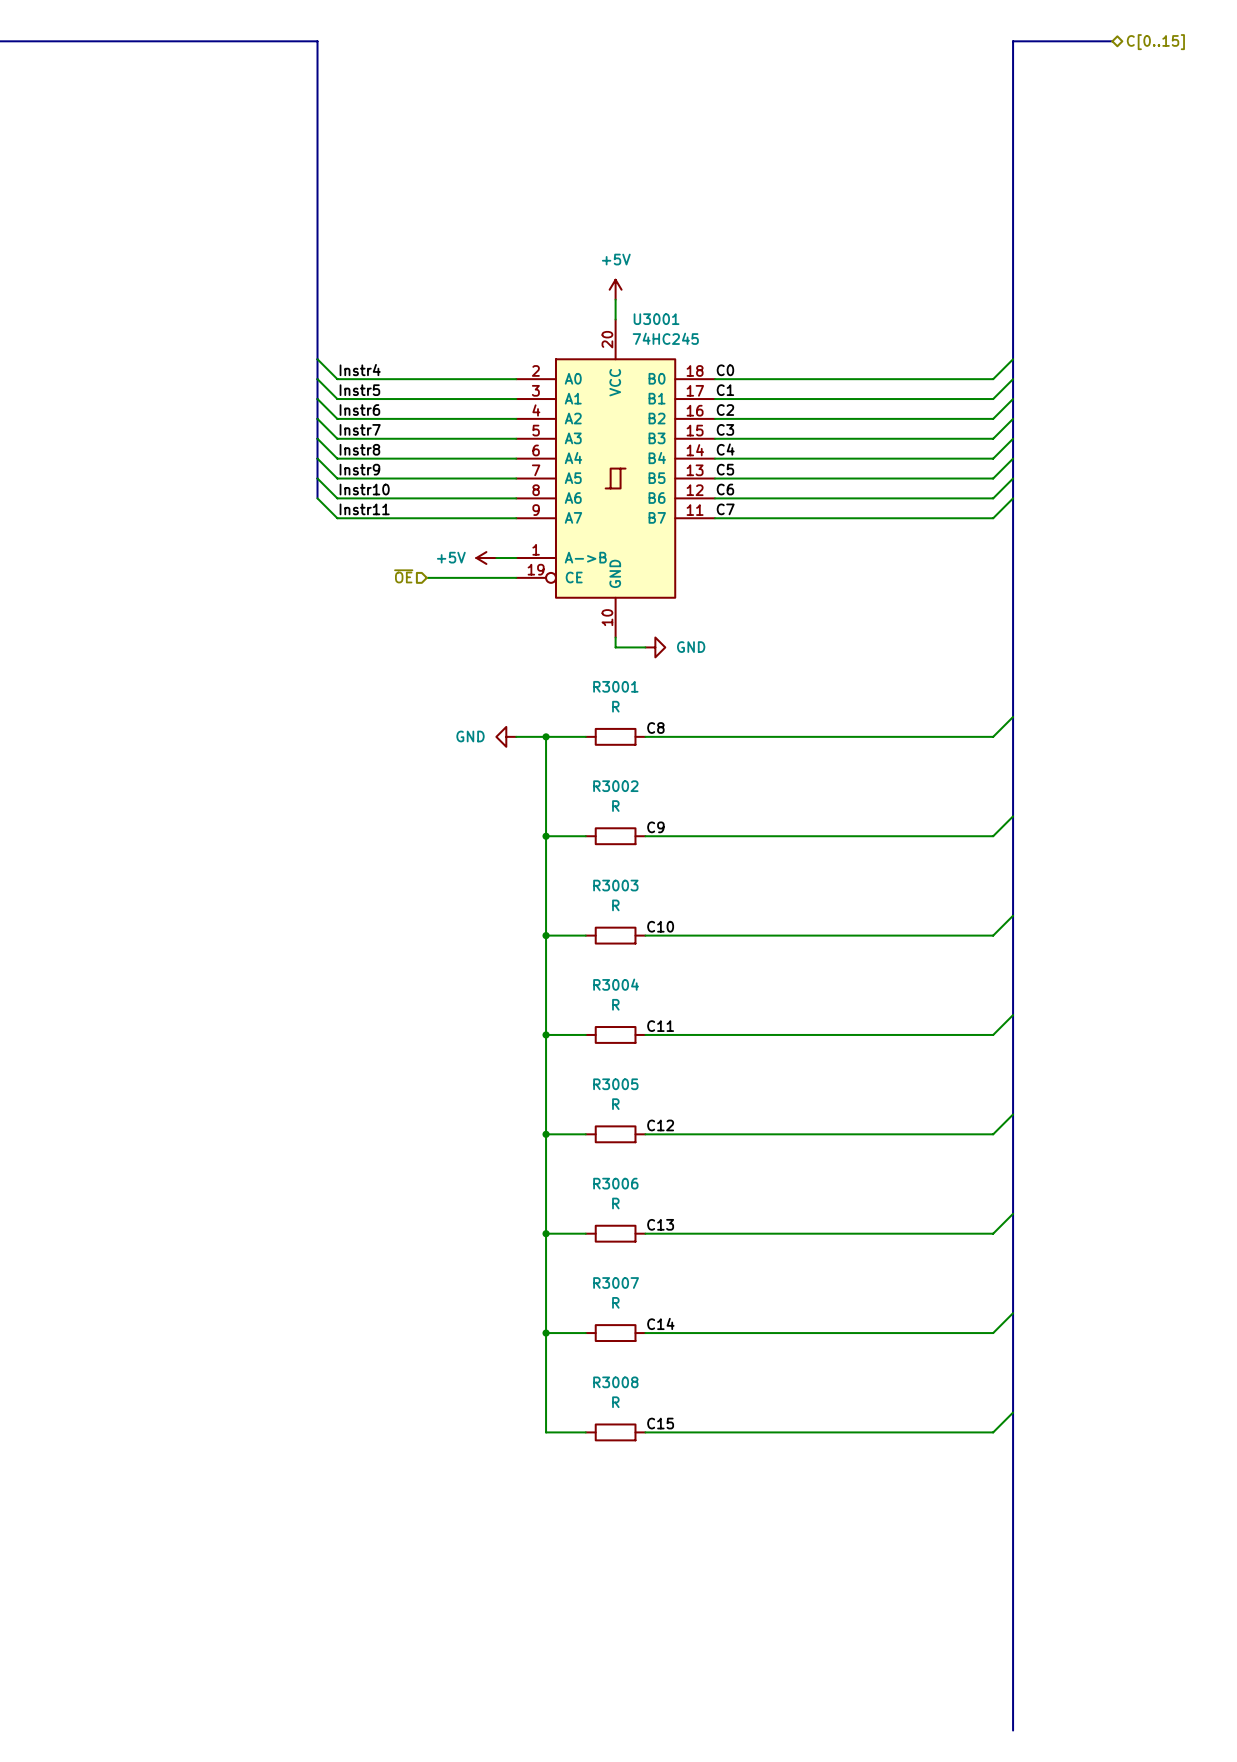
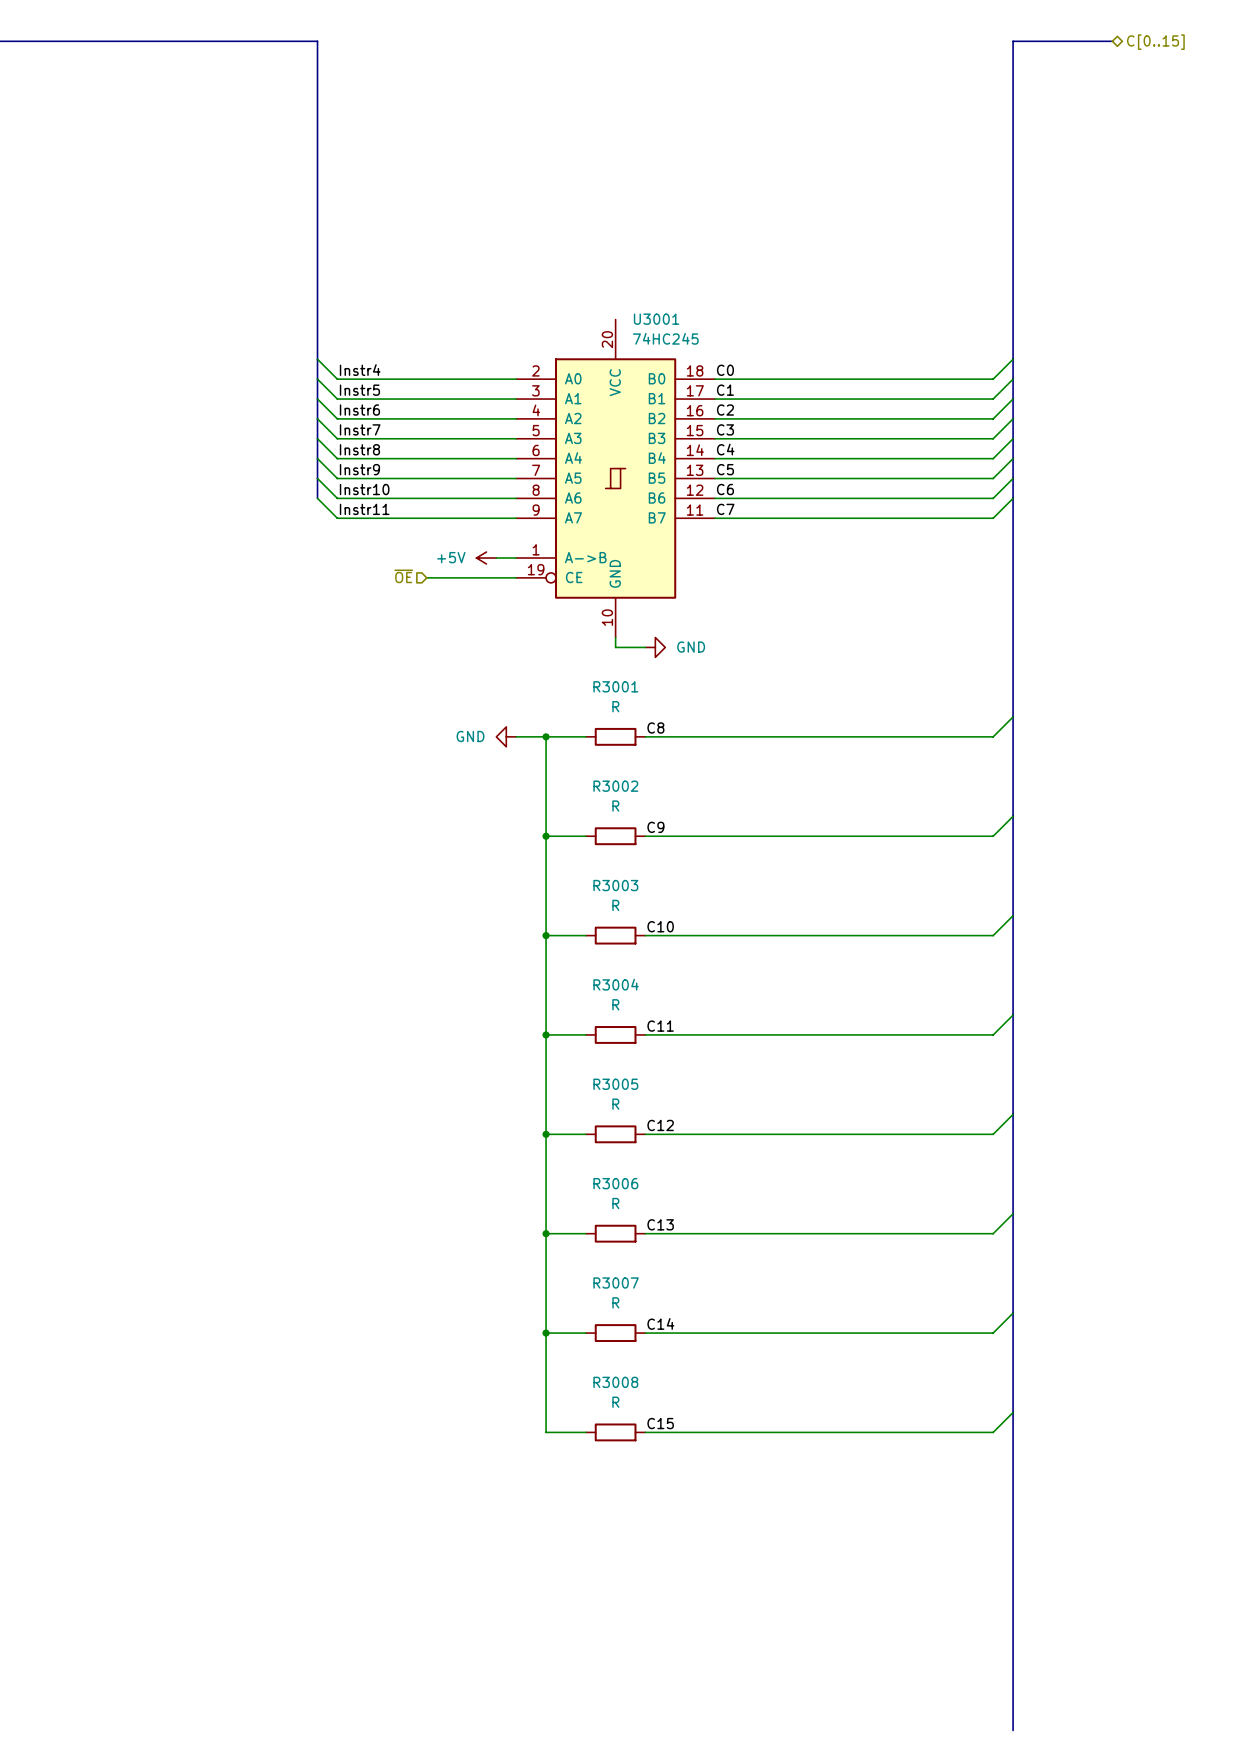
power symbol: +5V (615, 289) -> none
wire: (615, 299) (615, 319) -> none

